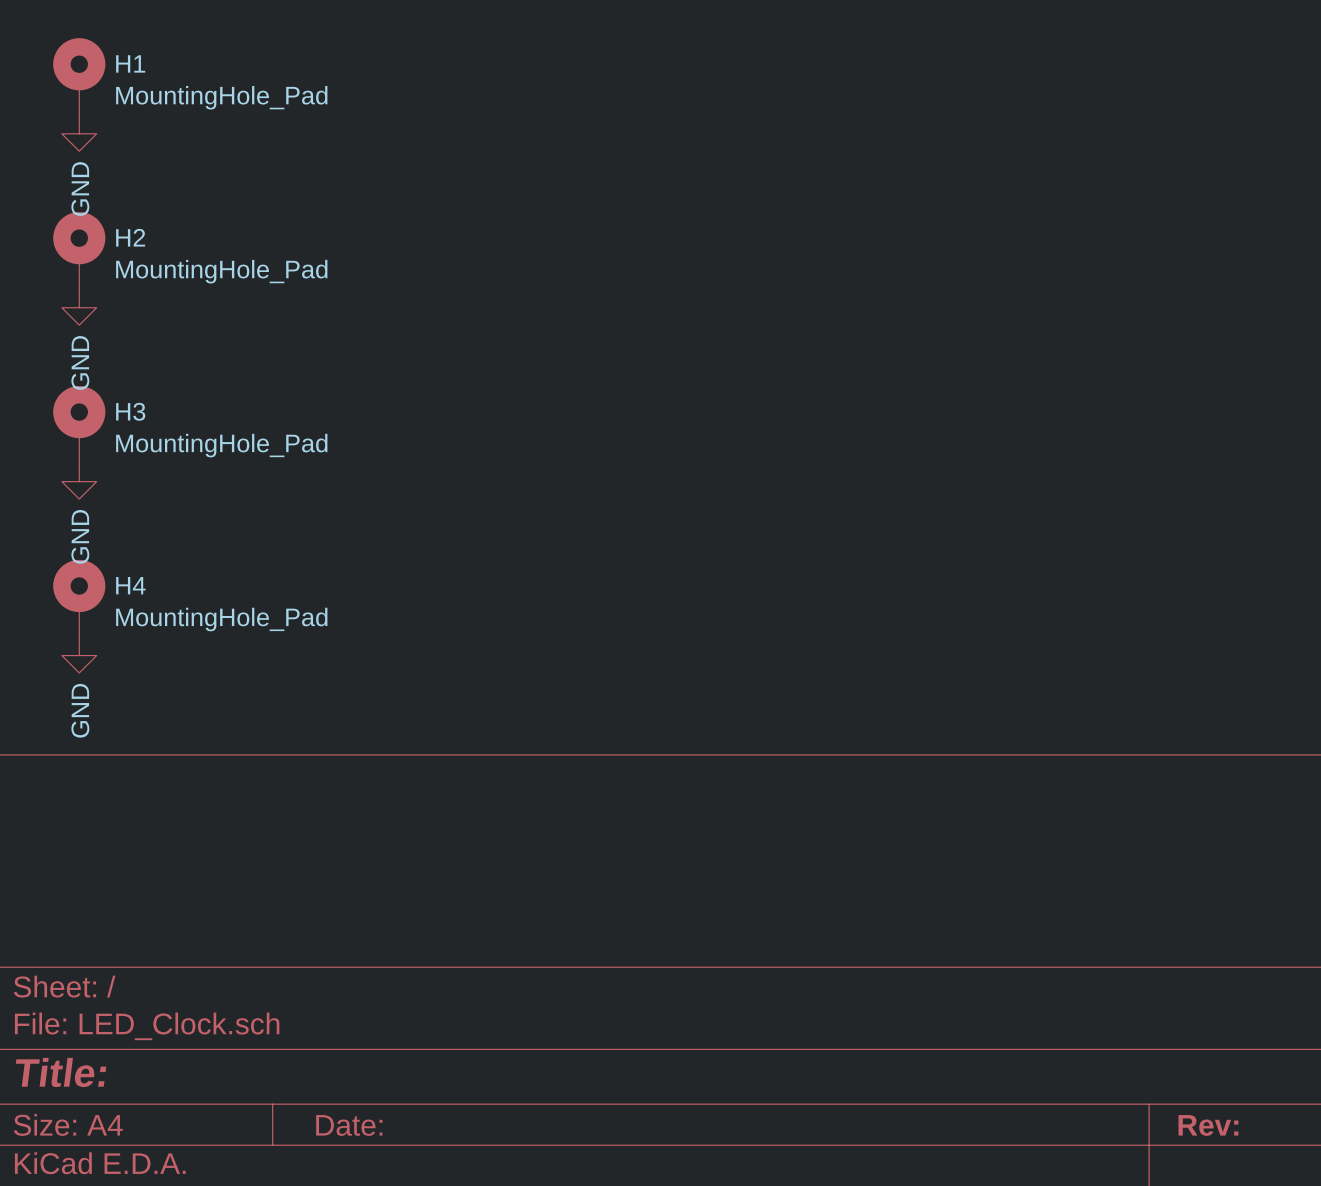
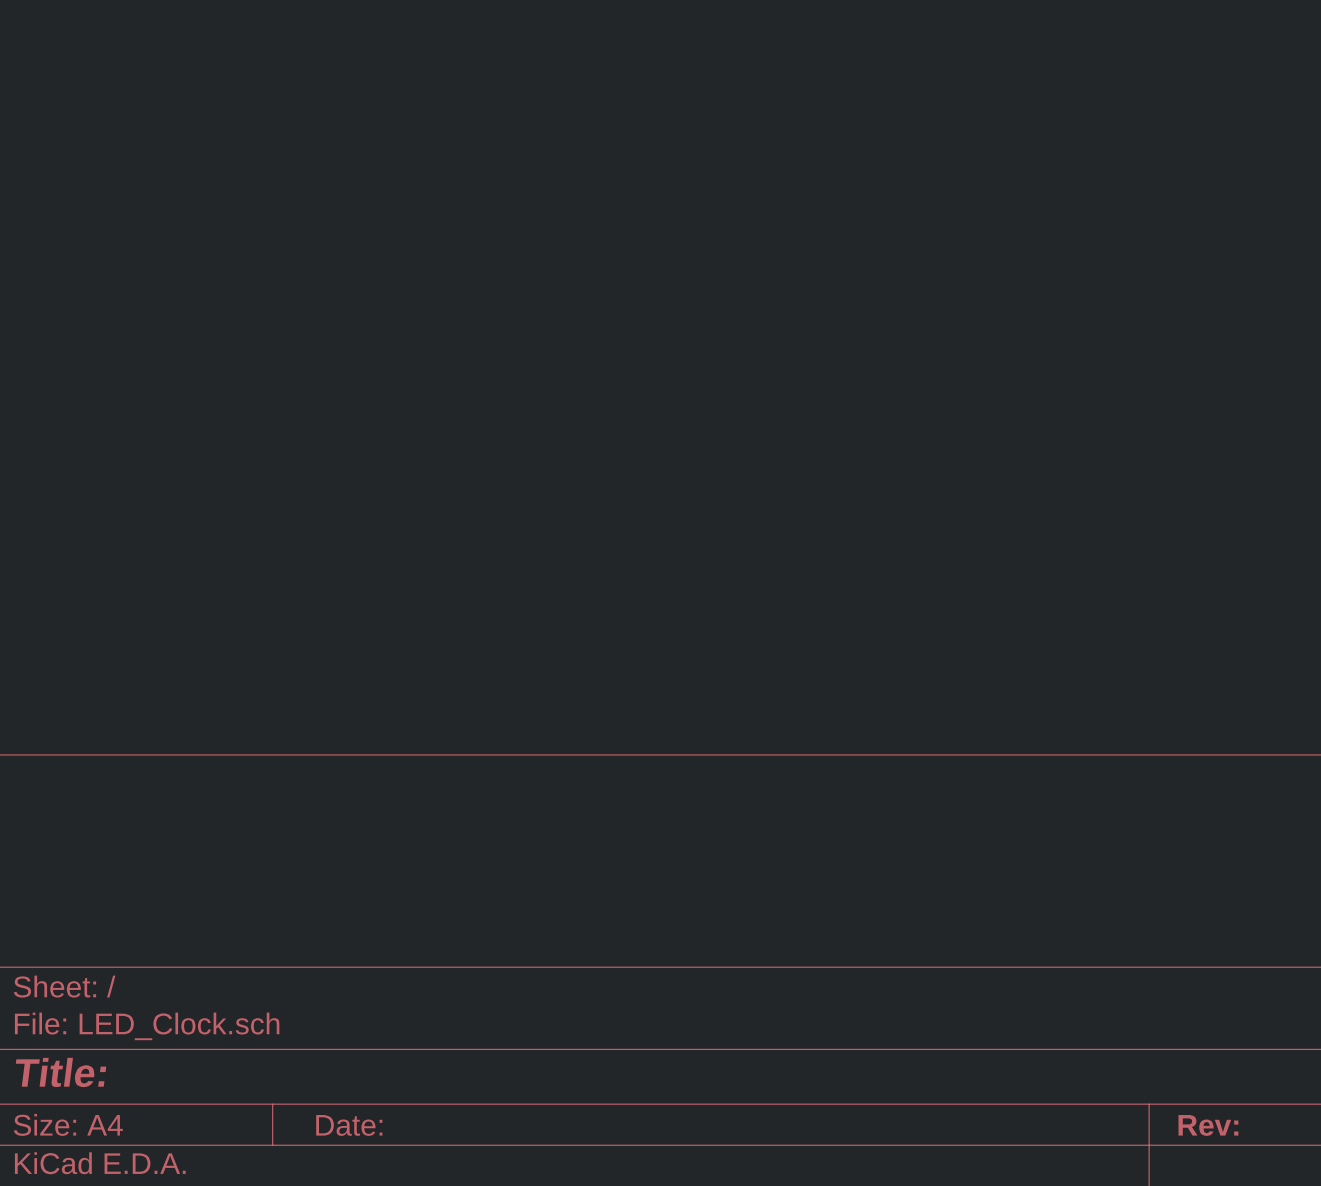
H1: MountingHole_Pad (79, 77) -> none
power symbol: GND (79, 133) -> none
H2: MountingHole_Pad (79, 251) -> none
power symbol: GND (79, 307) -> none
H3: MountingHole_Pad (79, 425) -> none
power symbol: GND (79, 481) -> none
H4: MountingHole_Pad (79, 599) -> none
power symbol: GND (79, 655) -> none

